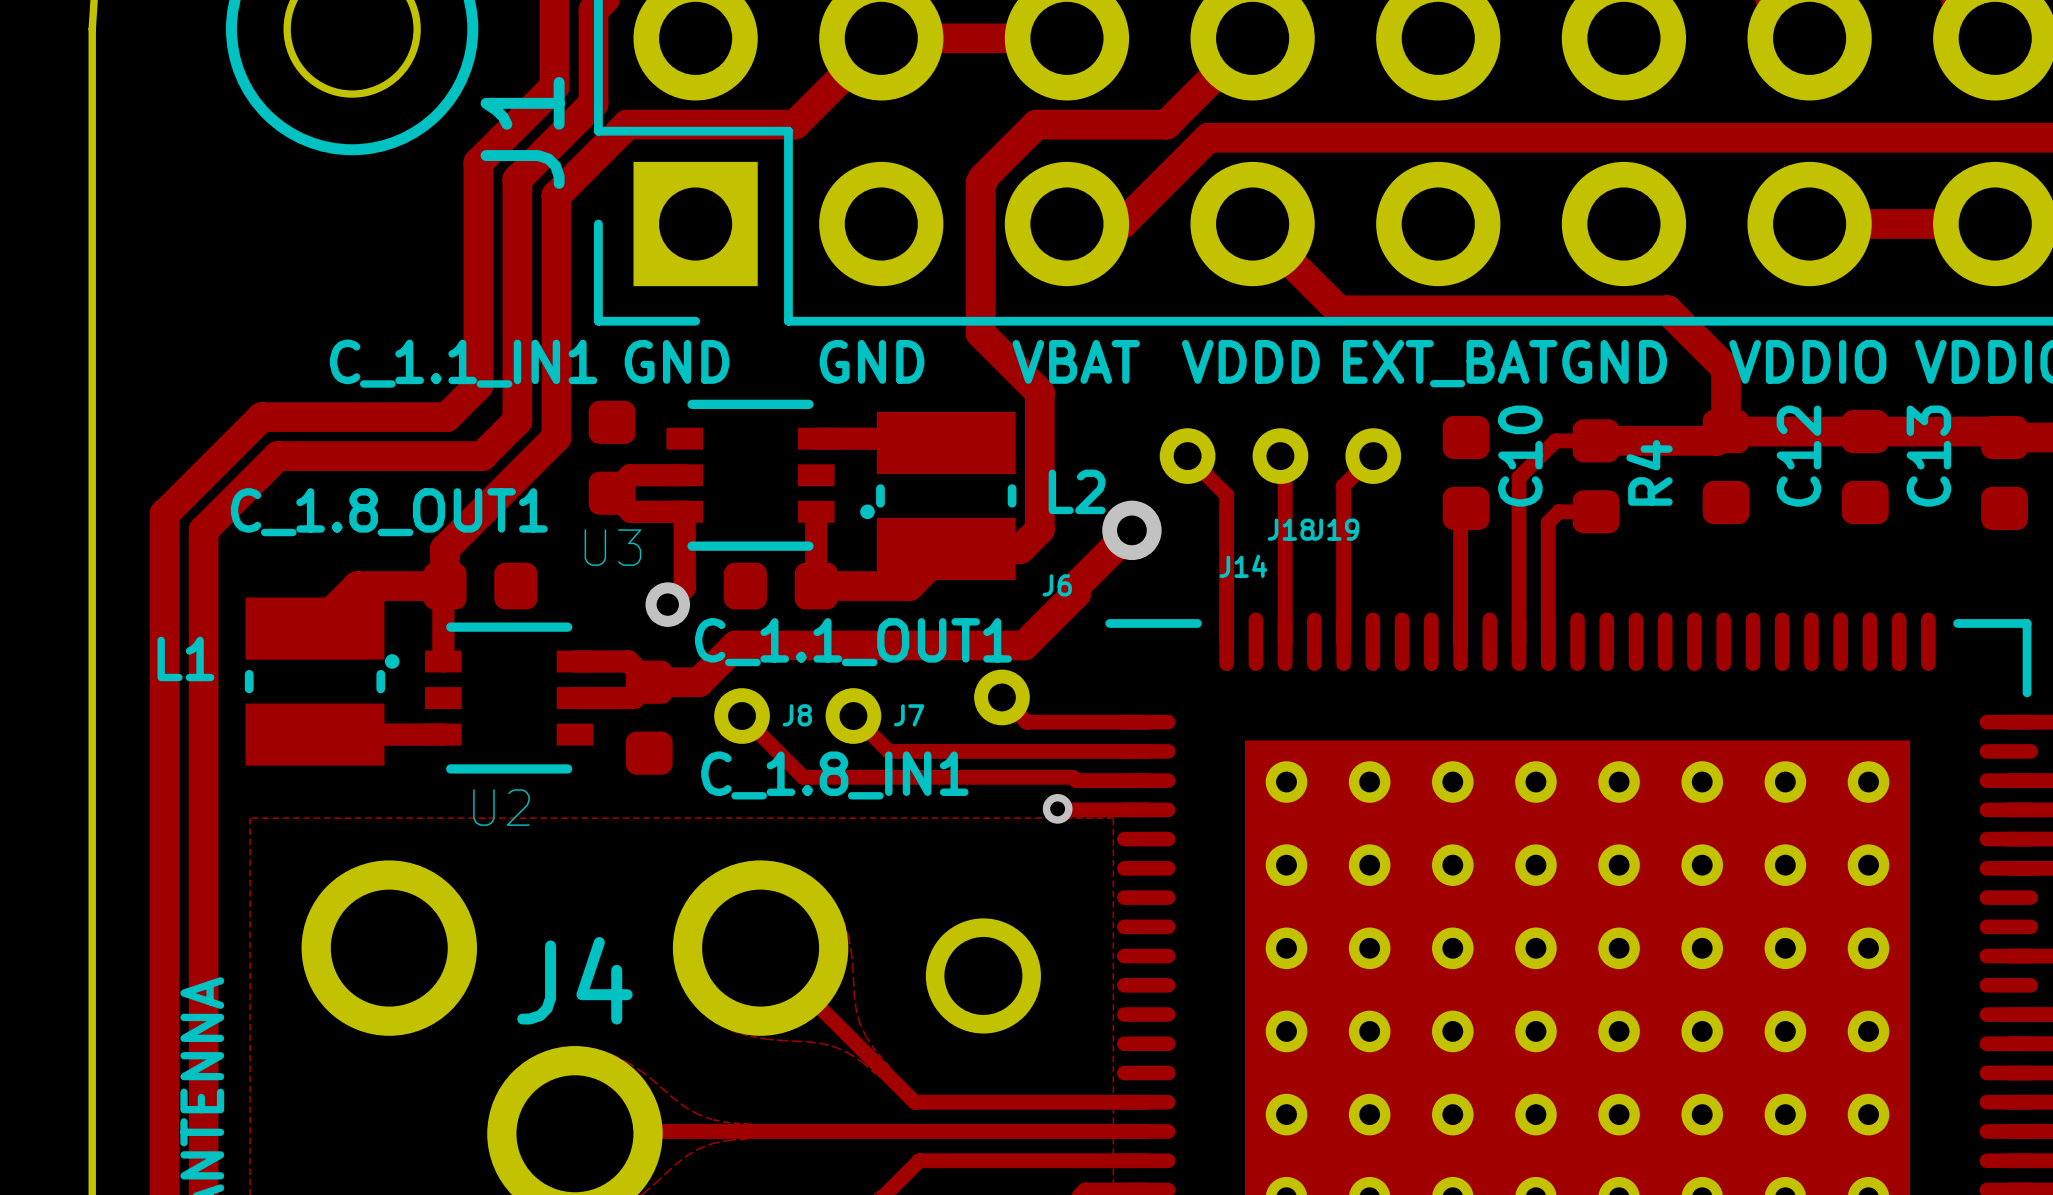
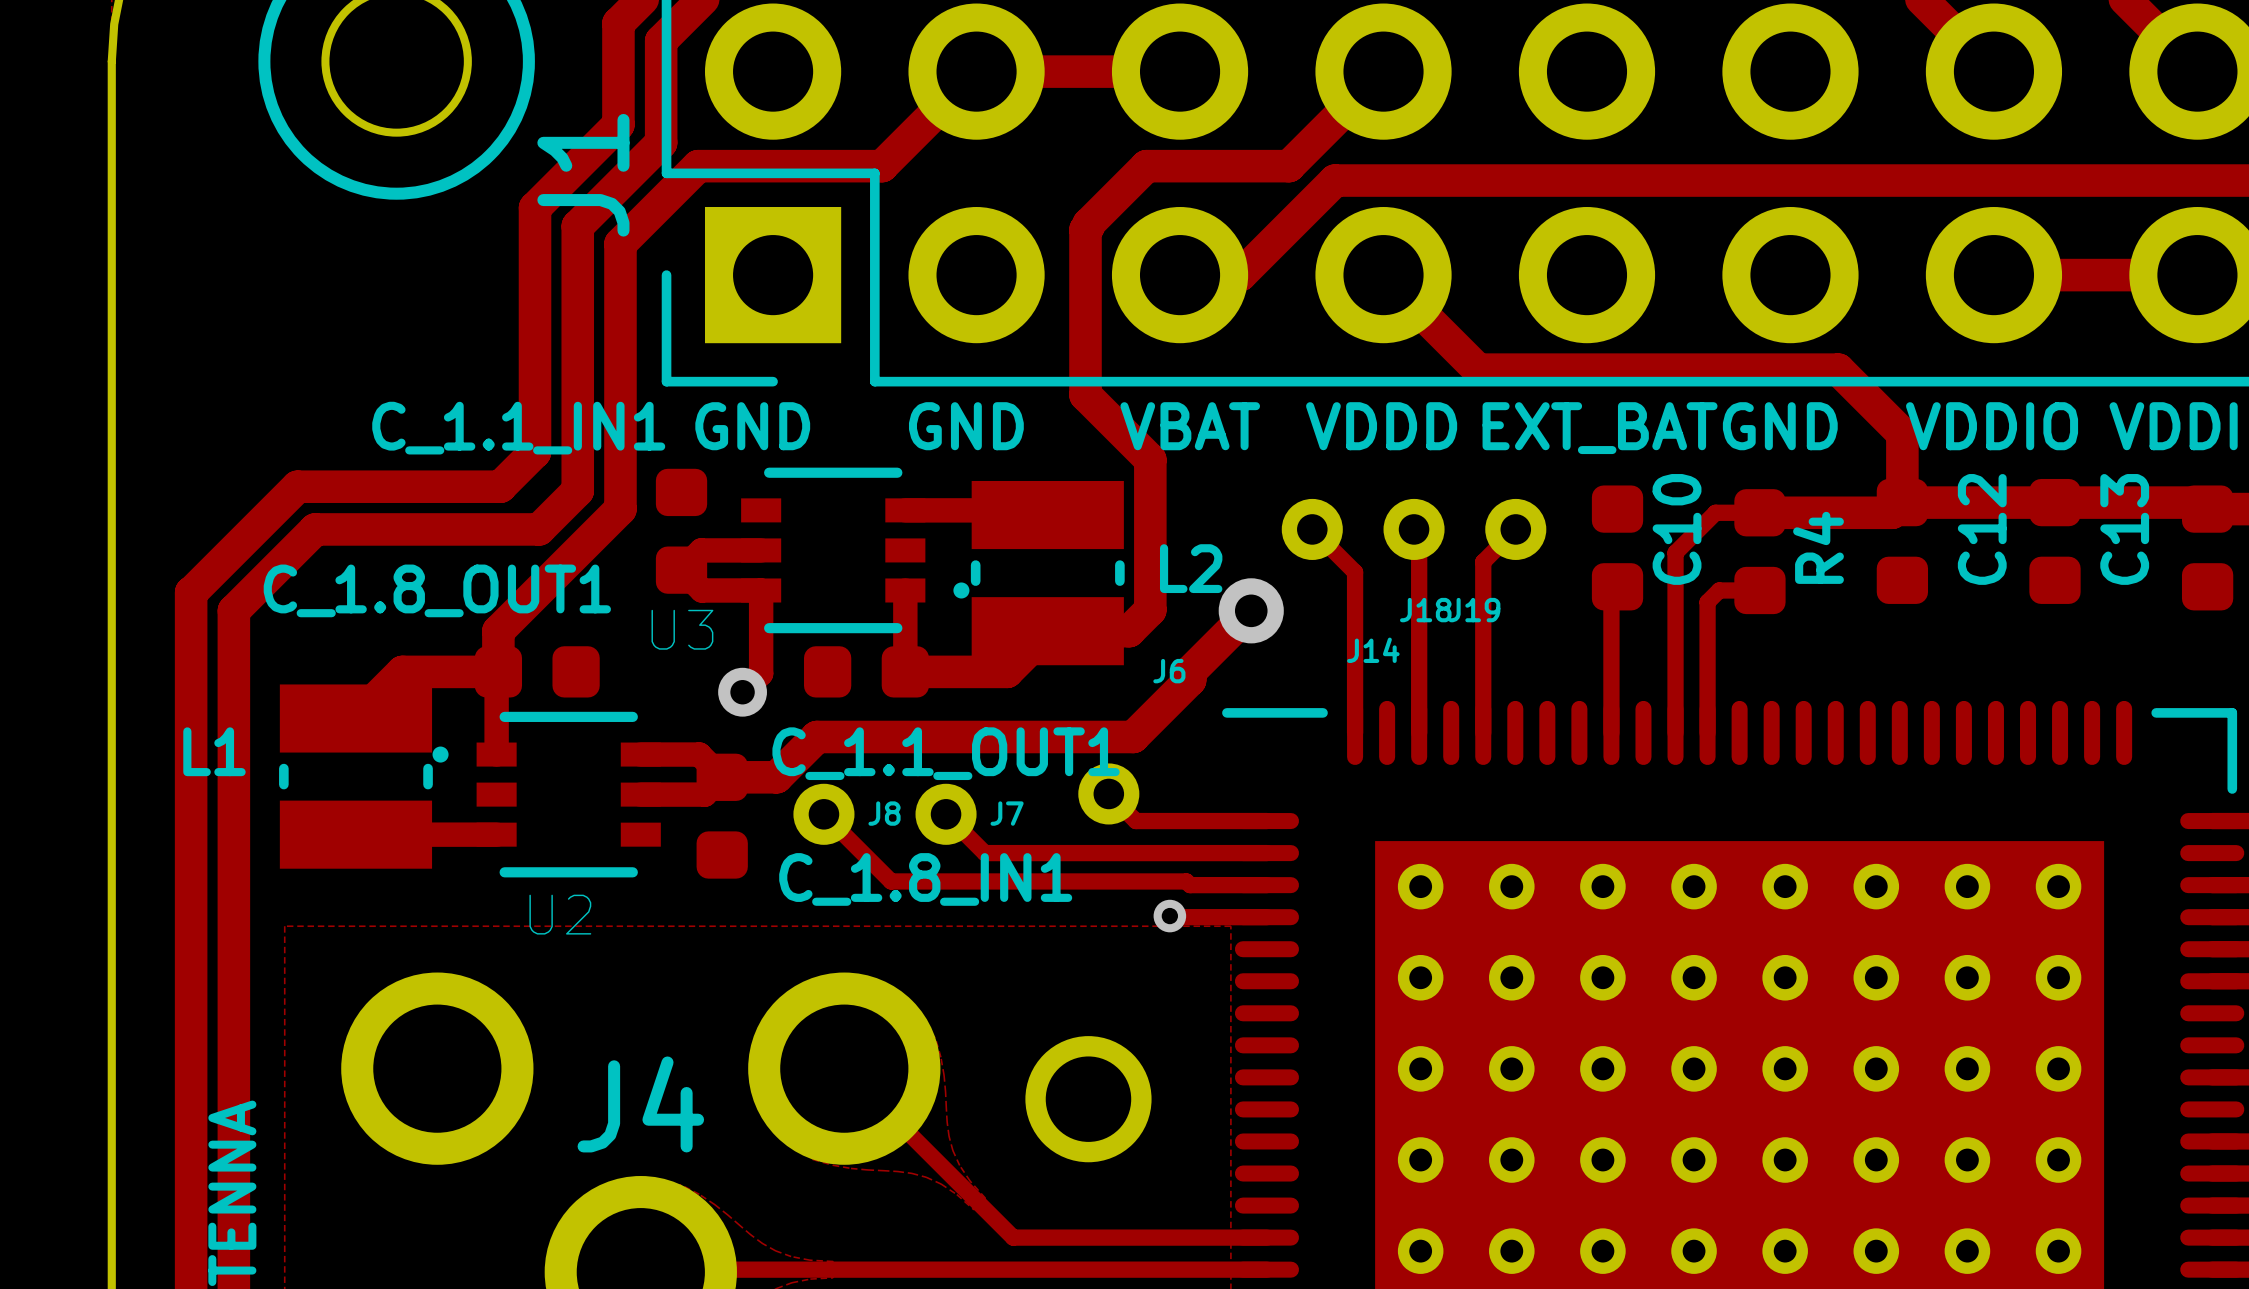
C_1.1_OUT1 name position: C_1.1_OUT1 (853, 642) -> C_1.1_OUT1 (946, 753)

